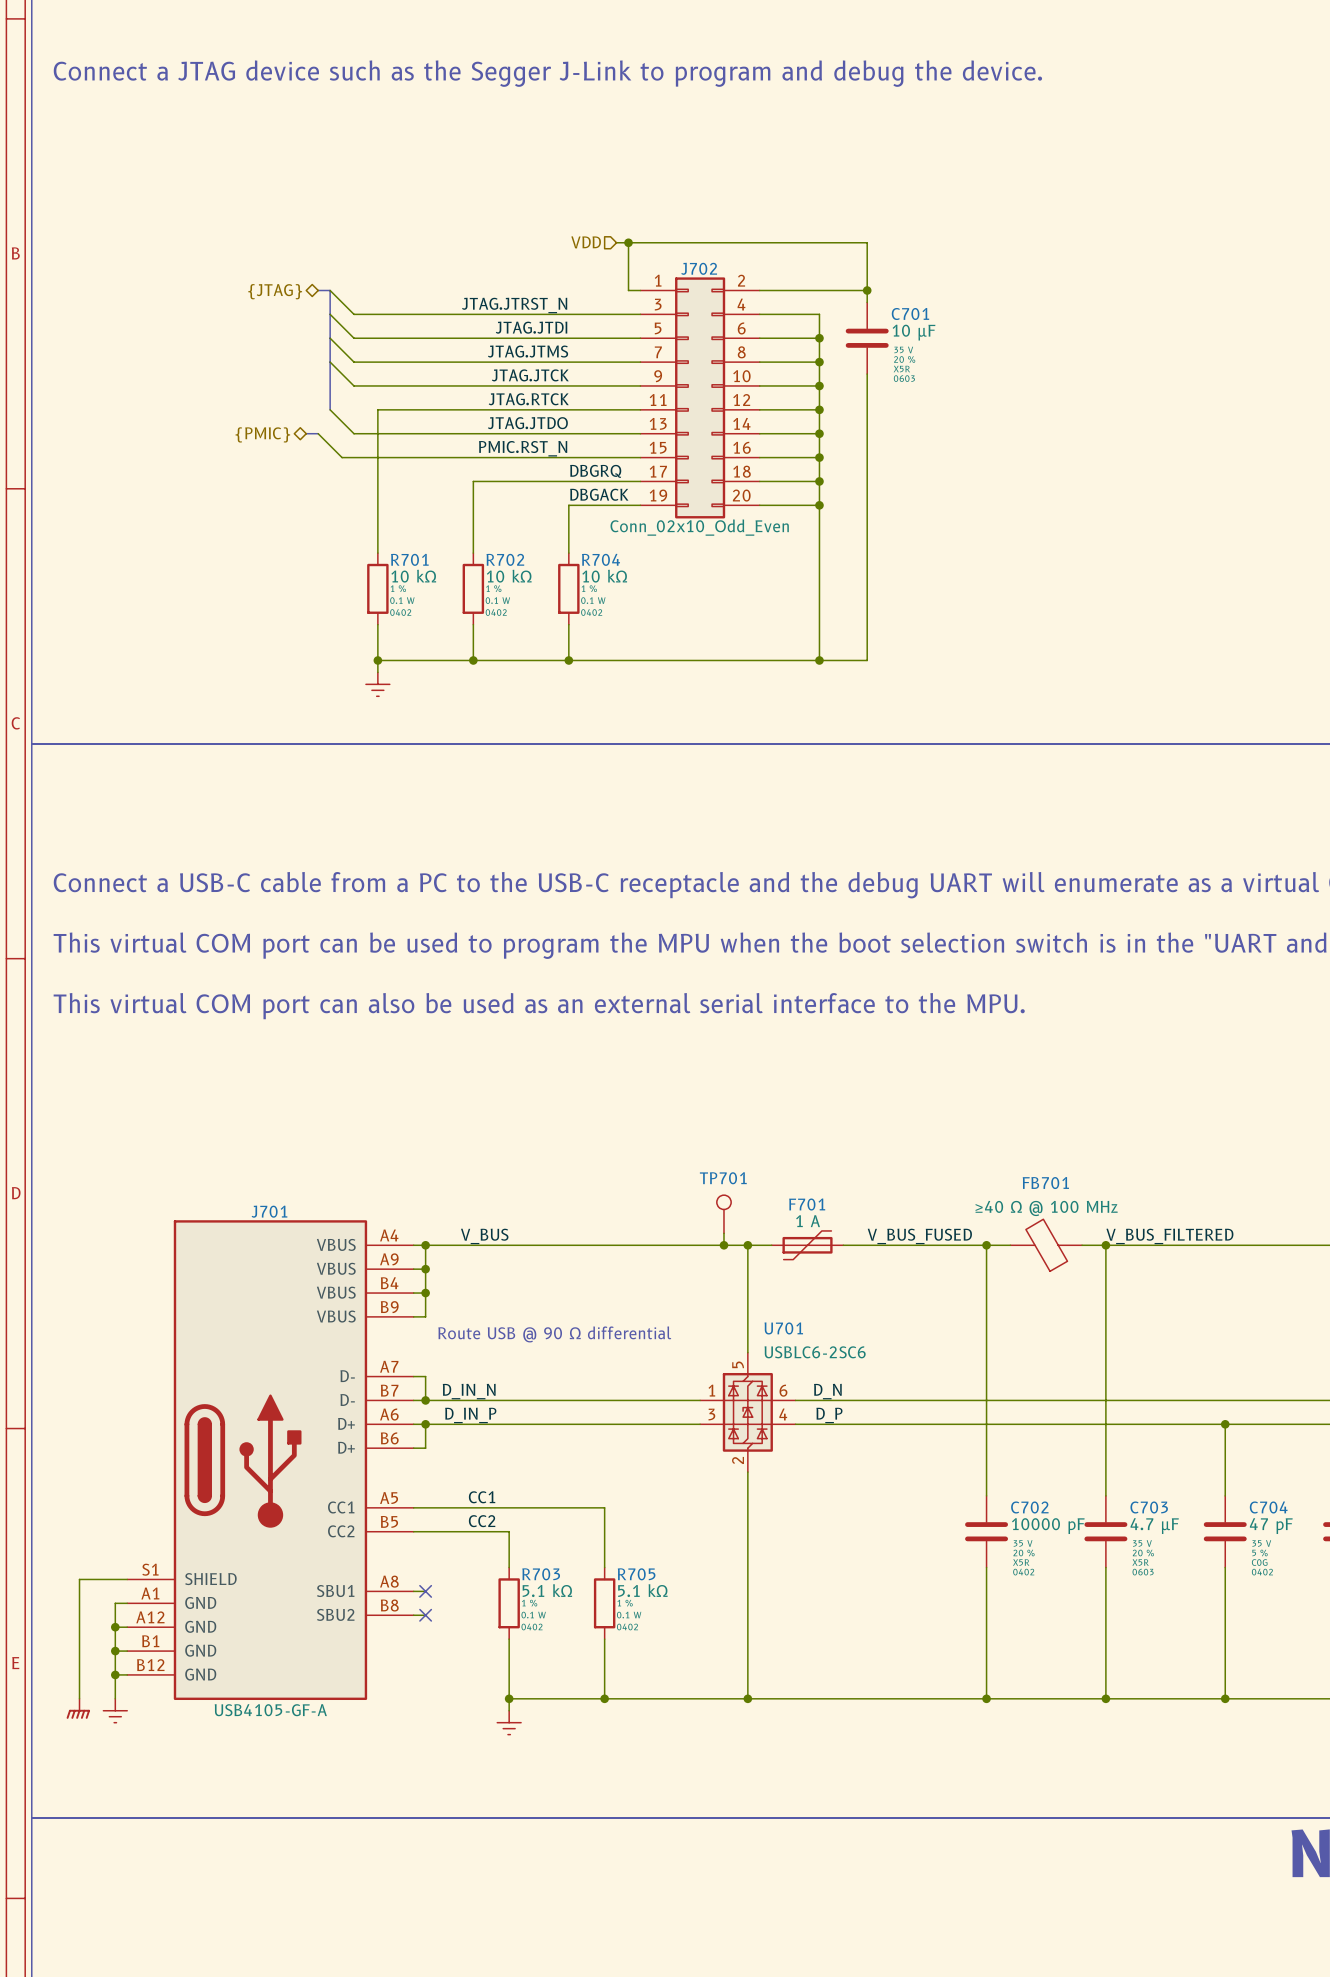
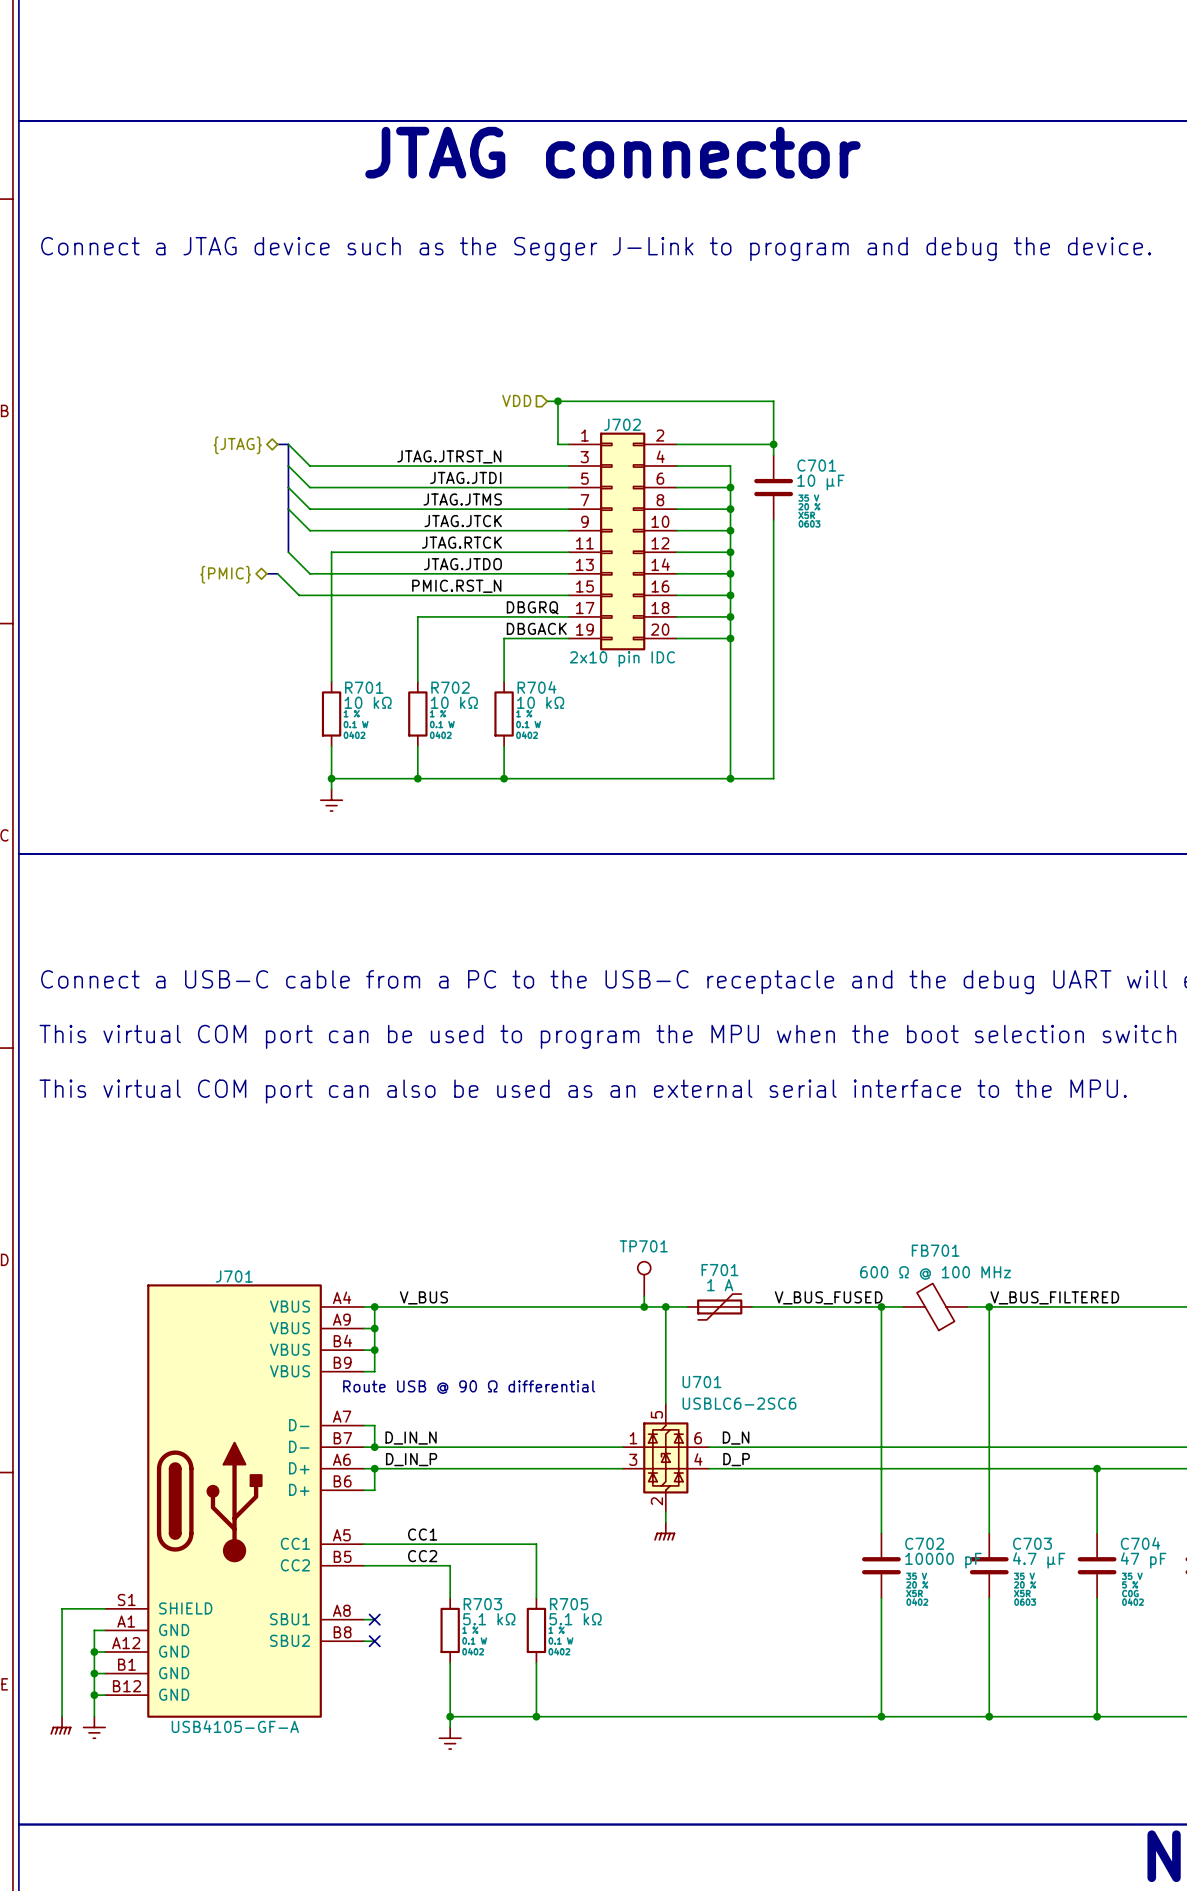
J702 value: Conn_02x10_Odd_Even (699, 527) -> 2x10 pin IDC (622, 659)
FB701 value: ≥40 Ω @ 100 MHz (1046, 1208) -> 600 Ω @ 100 MHz (935, 1273)
wire: (747, 1483) (747, 1698) -> none
power symbol: none -> (664, 1531)
junction: (747, 1698) -> none

